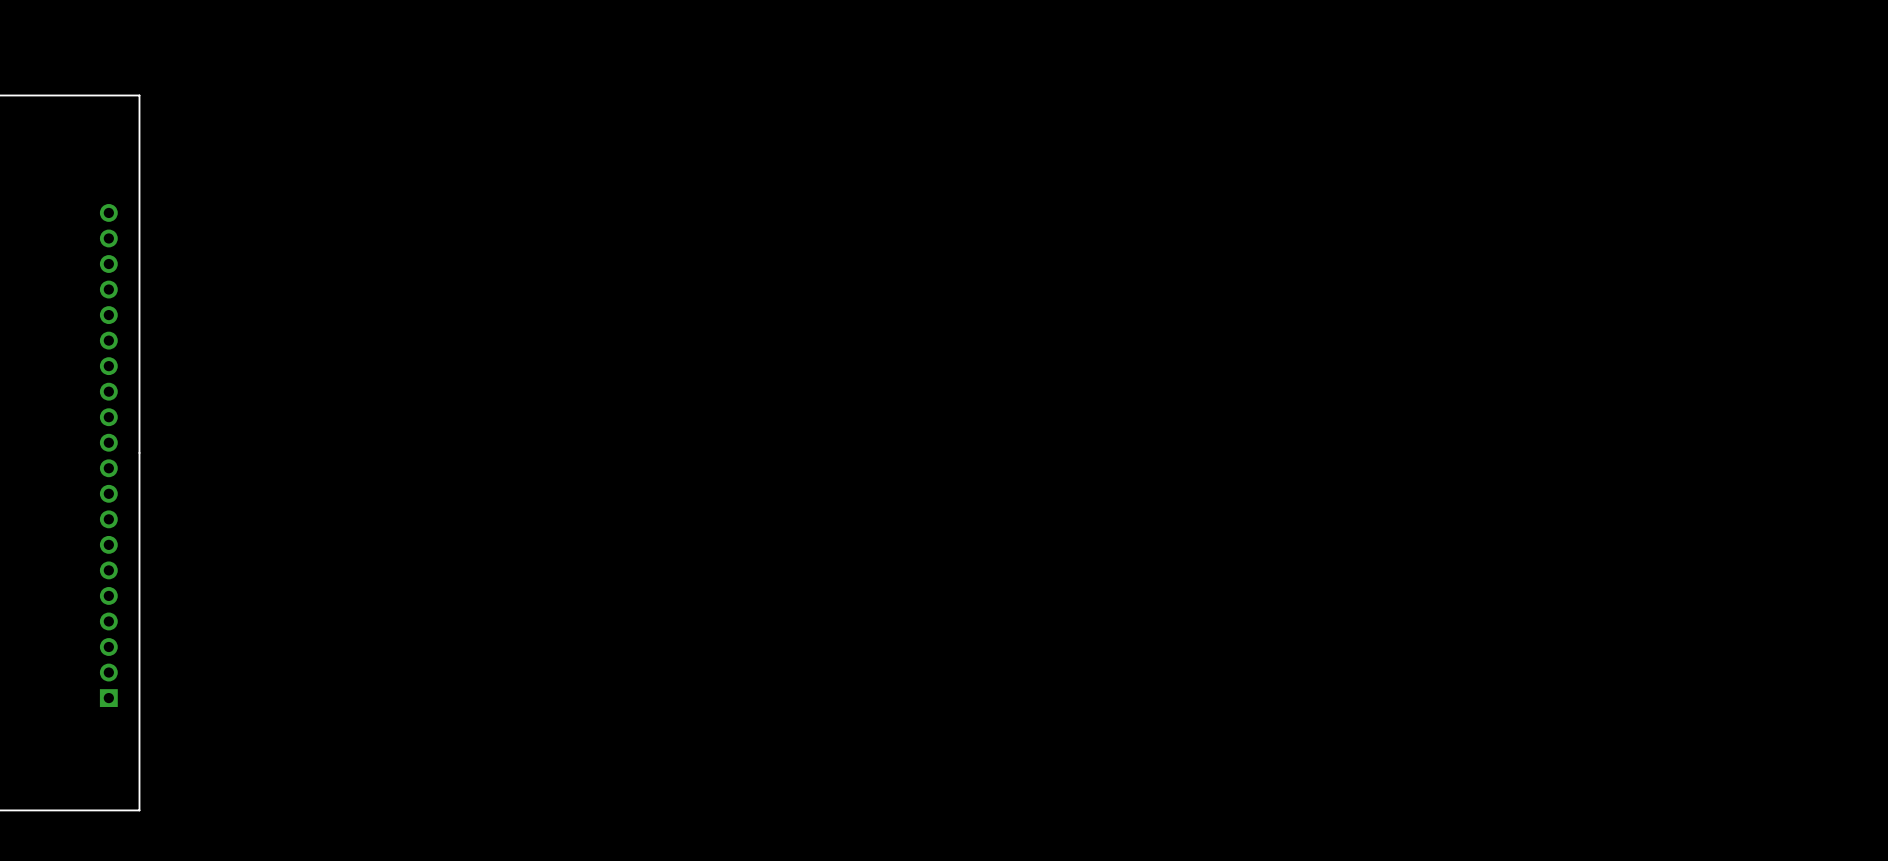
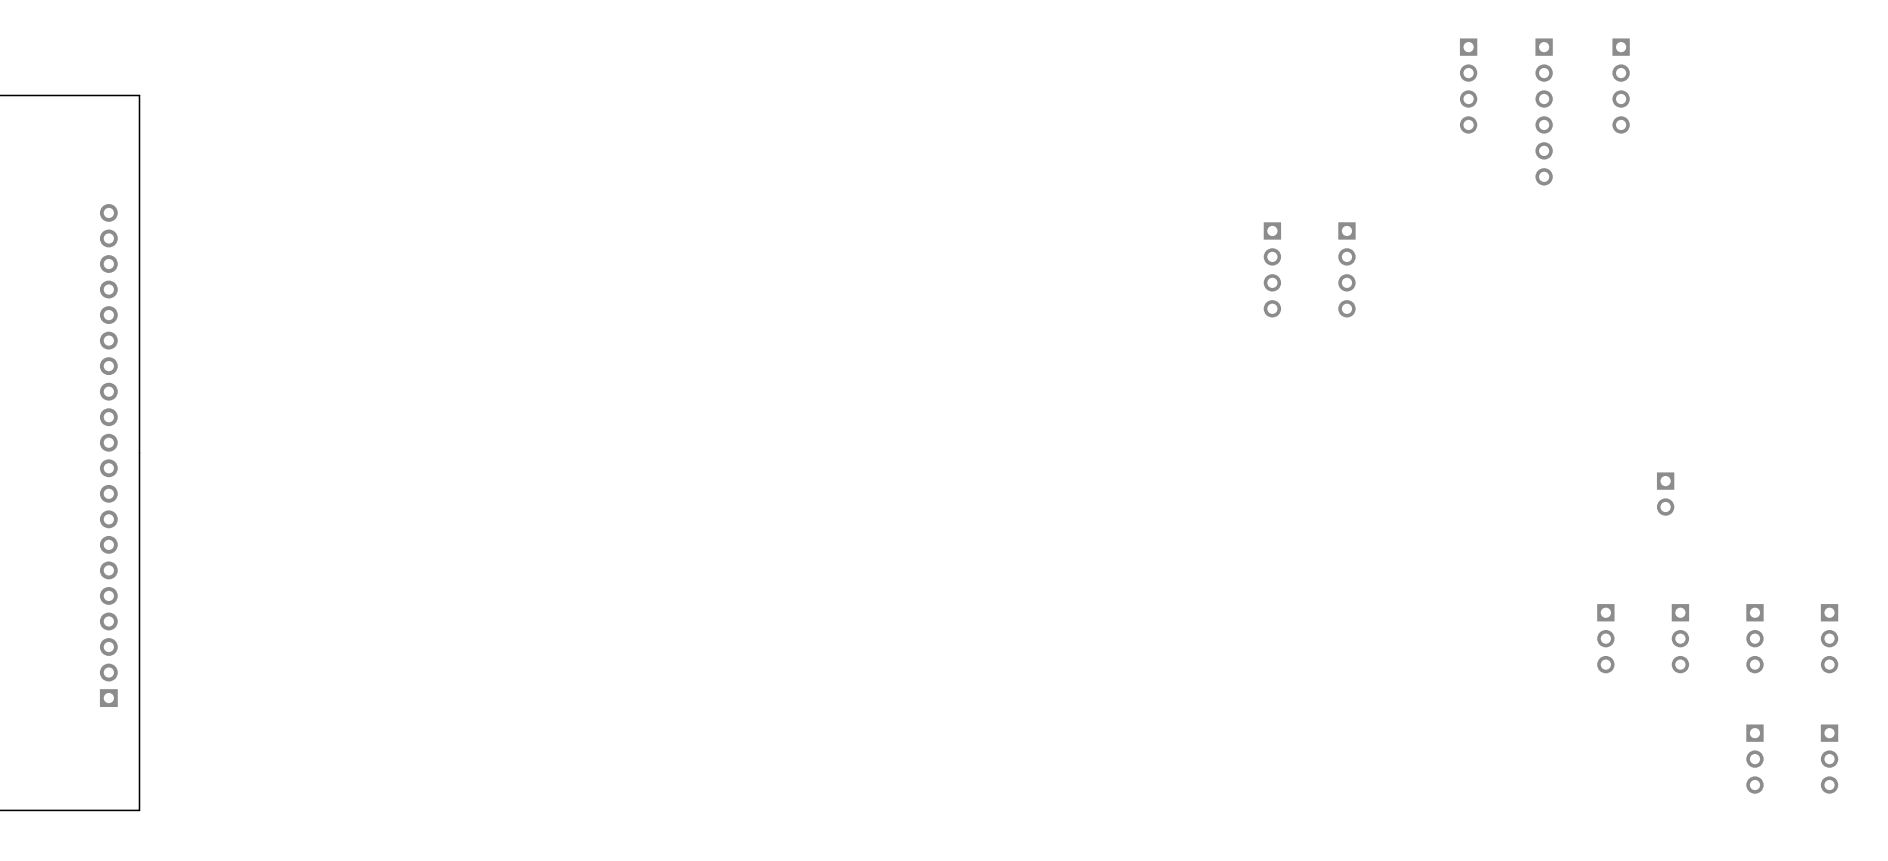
part: none -> (1468, 86)
part: none -> (1621, 86)
part: none -> (1544, 111)
part: none -> (1272, 269)
part: none -> (1346, 269)
part: none -> (1665, 494)
part: none -> (1605, 638)
part: none -> (1680, 638)
part: none -> (1754, 638)
part: none -> (1829, 638)
part: none -> (1754, 759)
part: none -> (1829, 759)

